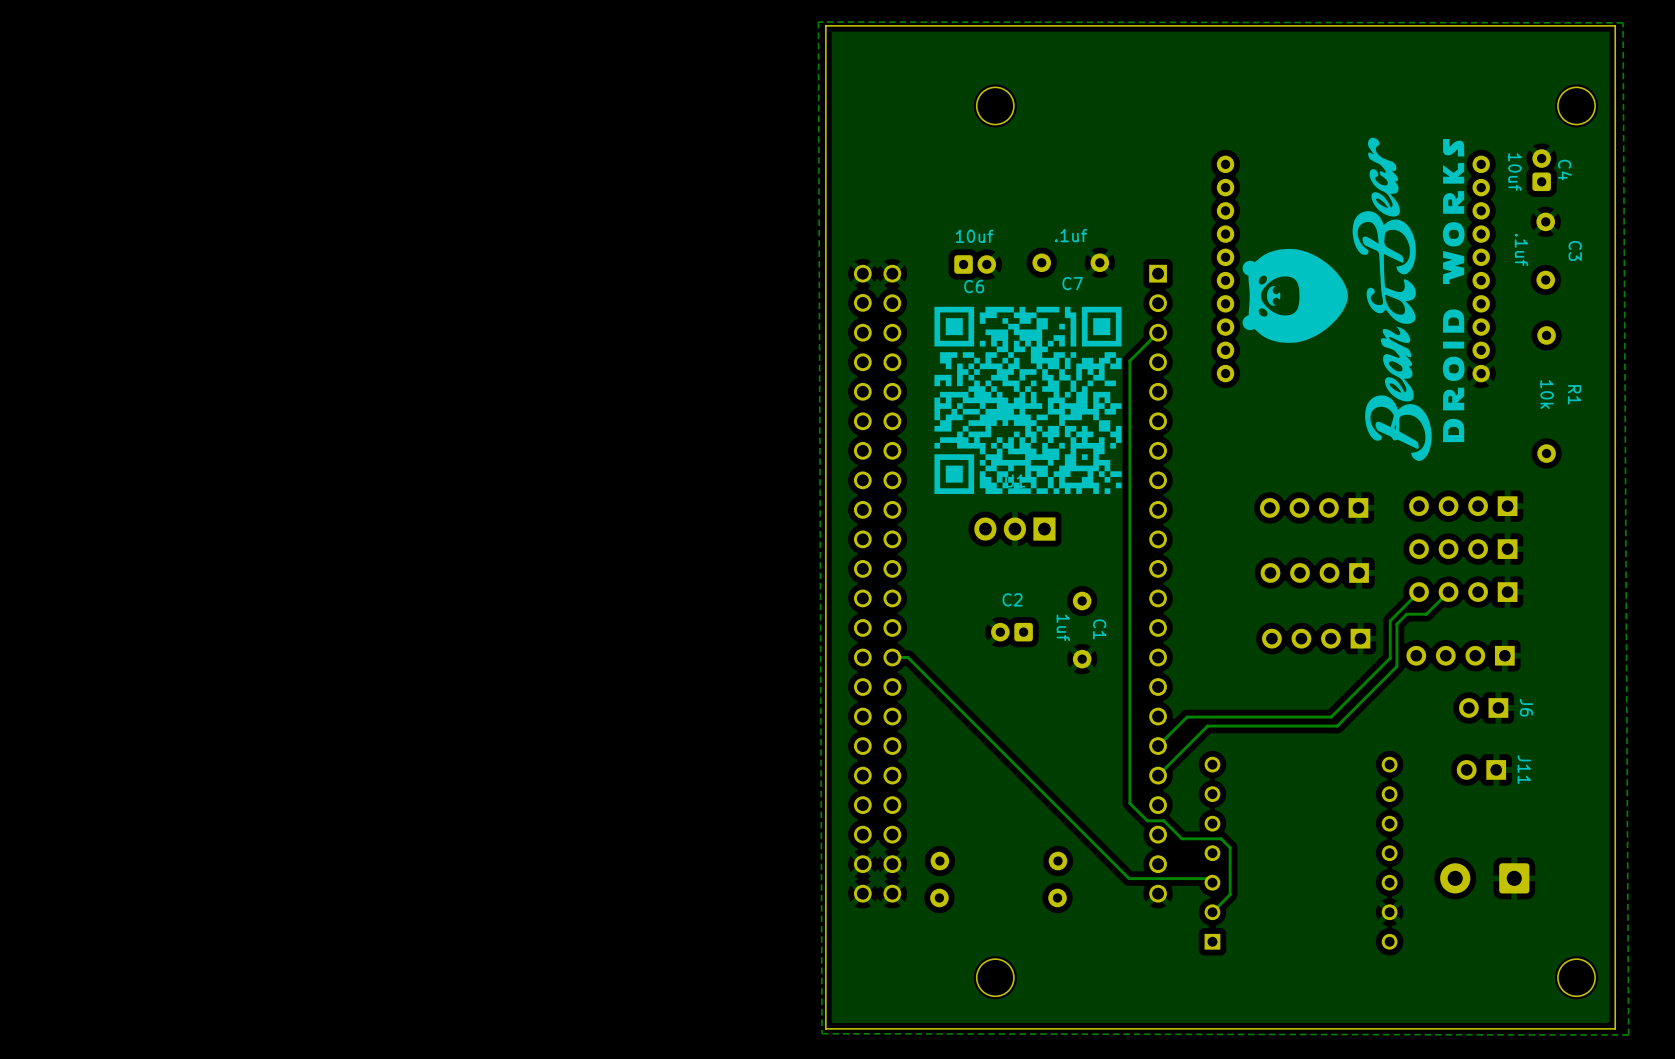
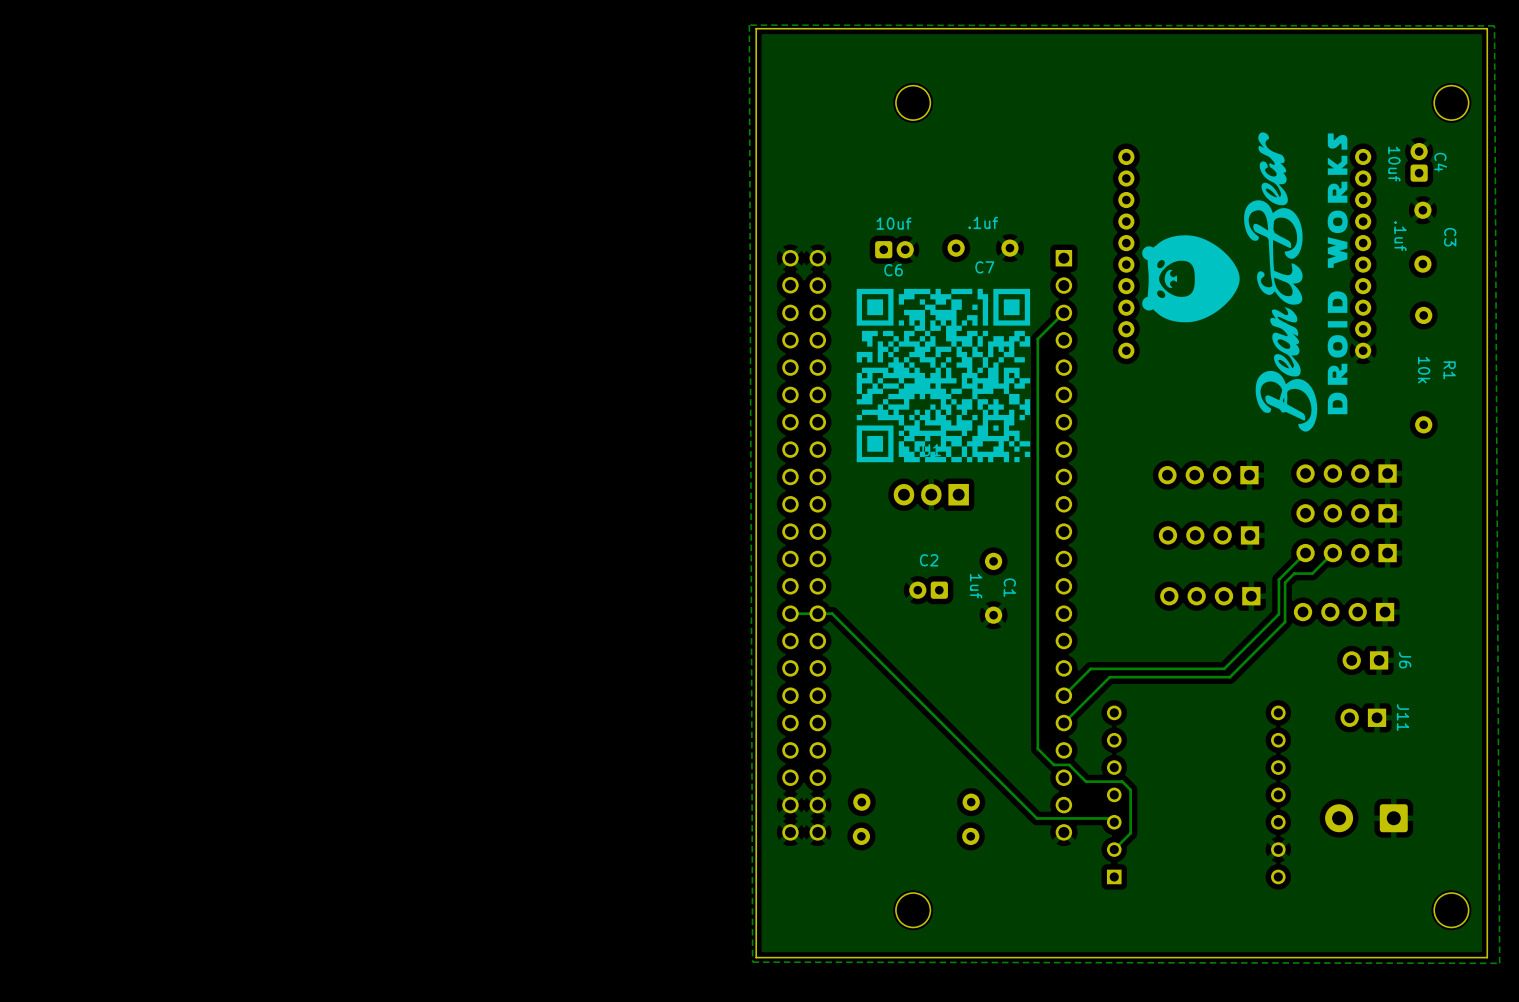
track: none -> (817, 613) (790, 613)

